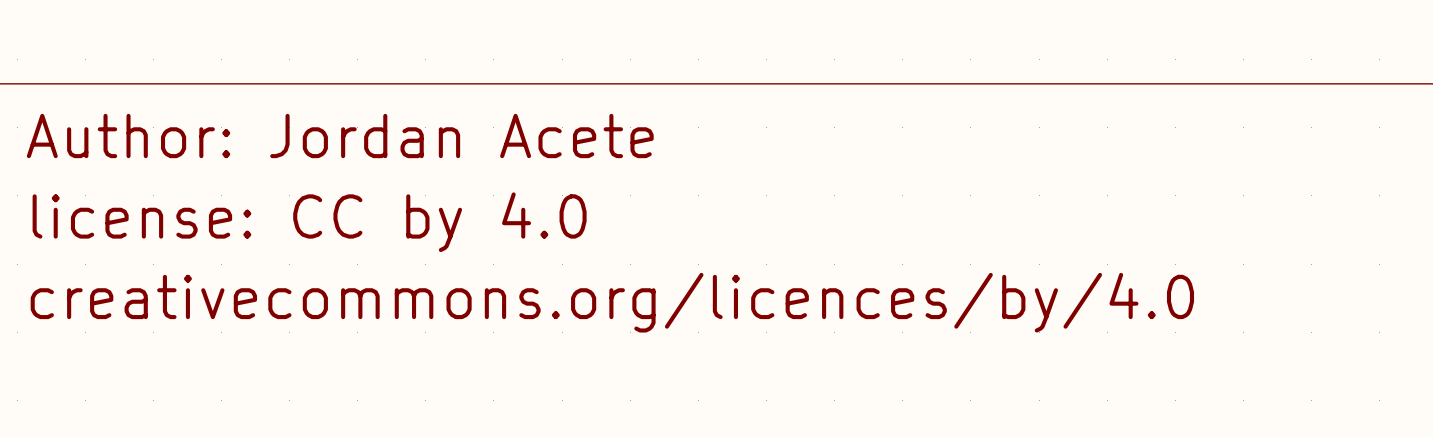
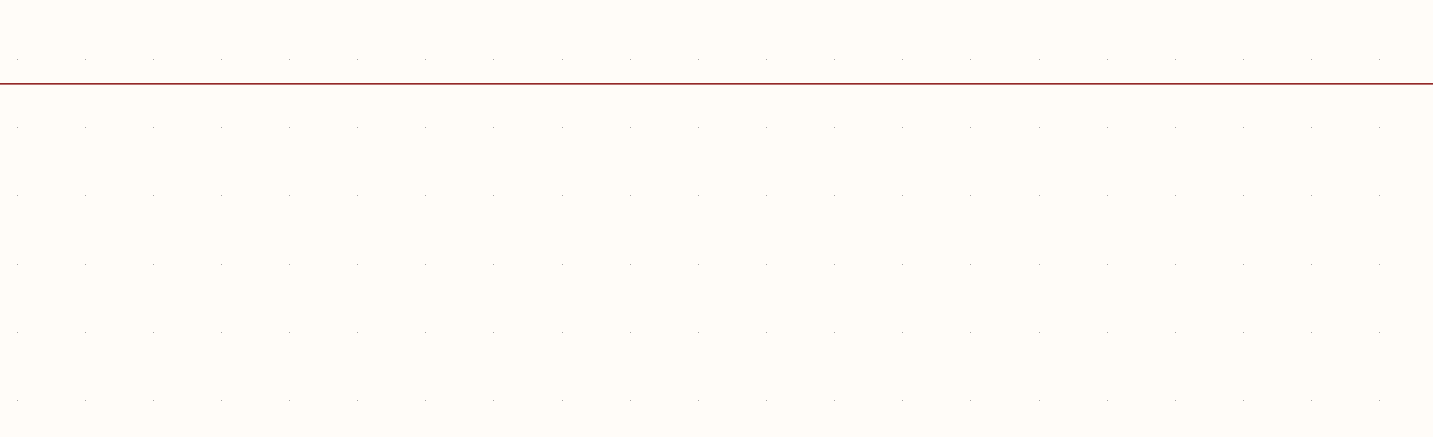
title block: Author: Jordan Acete (340, 136) -> none
title block: license: CC by 4.0 (309, 222) -> none
title block: creativecommons.org/licences/by/4.0 (612, 302) -> none

